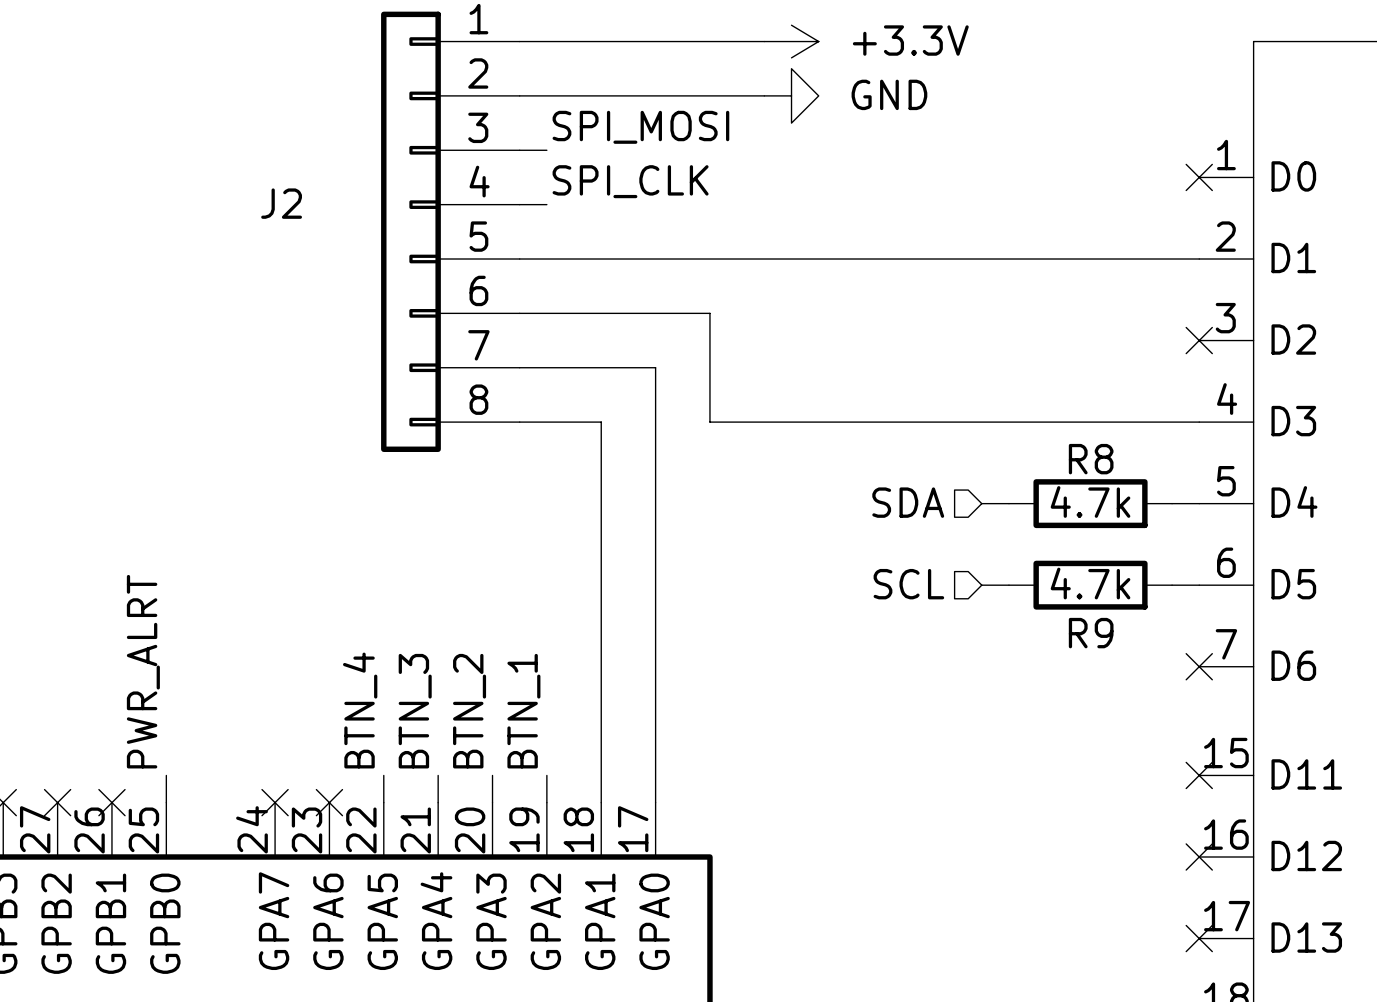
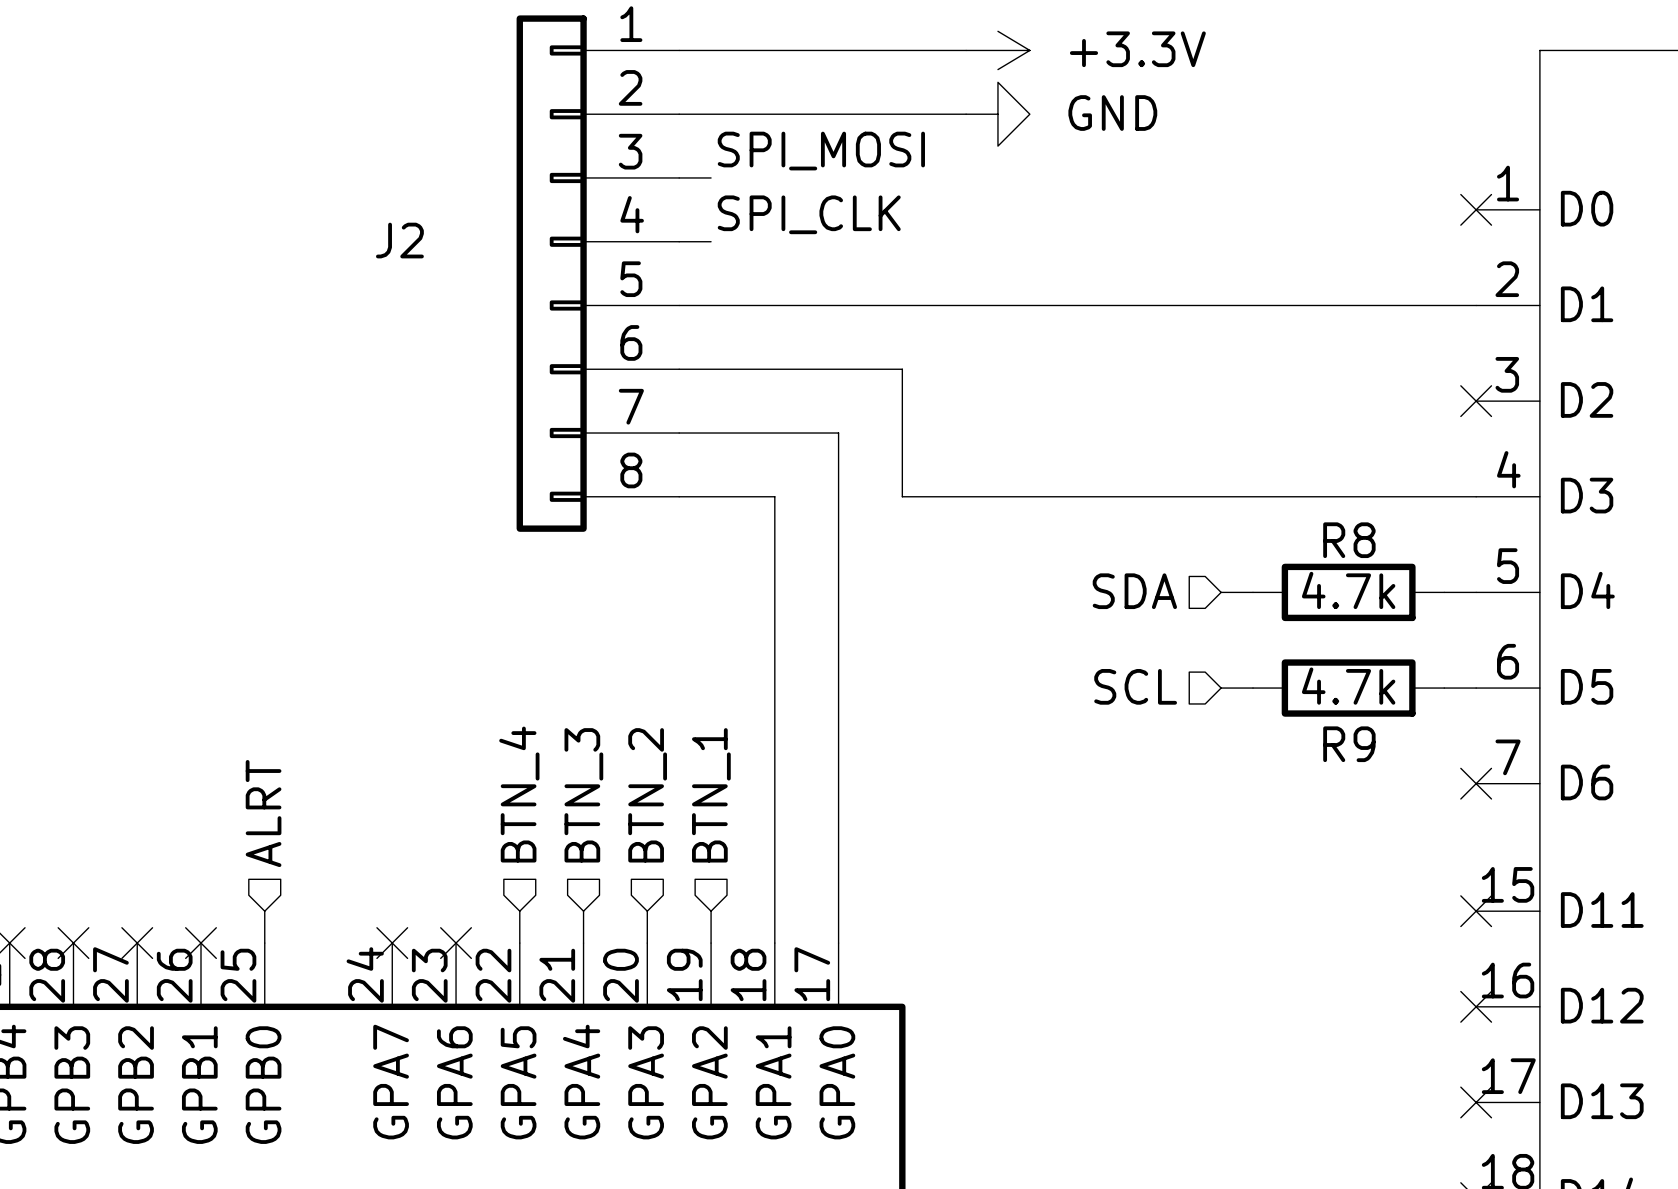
label: PWR_ALRT (143, 671) -> none
hierarchical label: none -> BTN_4 (519, 794)
hierarchical label: none -> BTN_3 (583, 795)
hierarchical label: none -> BTN_2 (647, 795)
hierarchical label: none -> BTN_1 (711, 795)
hierarchical label: none -> ALRT (263, 813)
label: BTN_4 (360, 710) -> none
label: BTN_3 (415, 711) -> none
label: BTN_2 (469, 711) -> none
label: BTN_1 (523, 711) -> none

